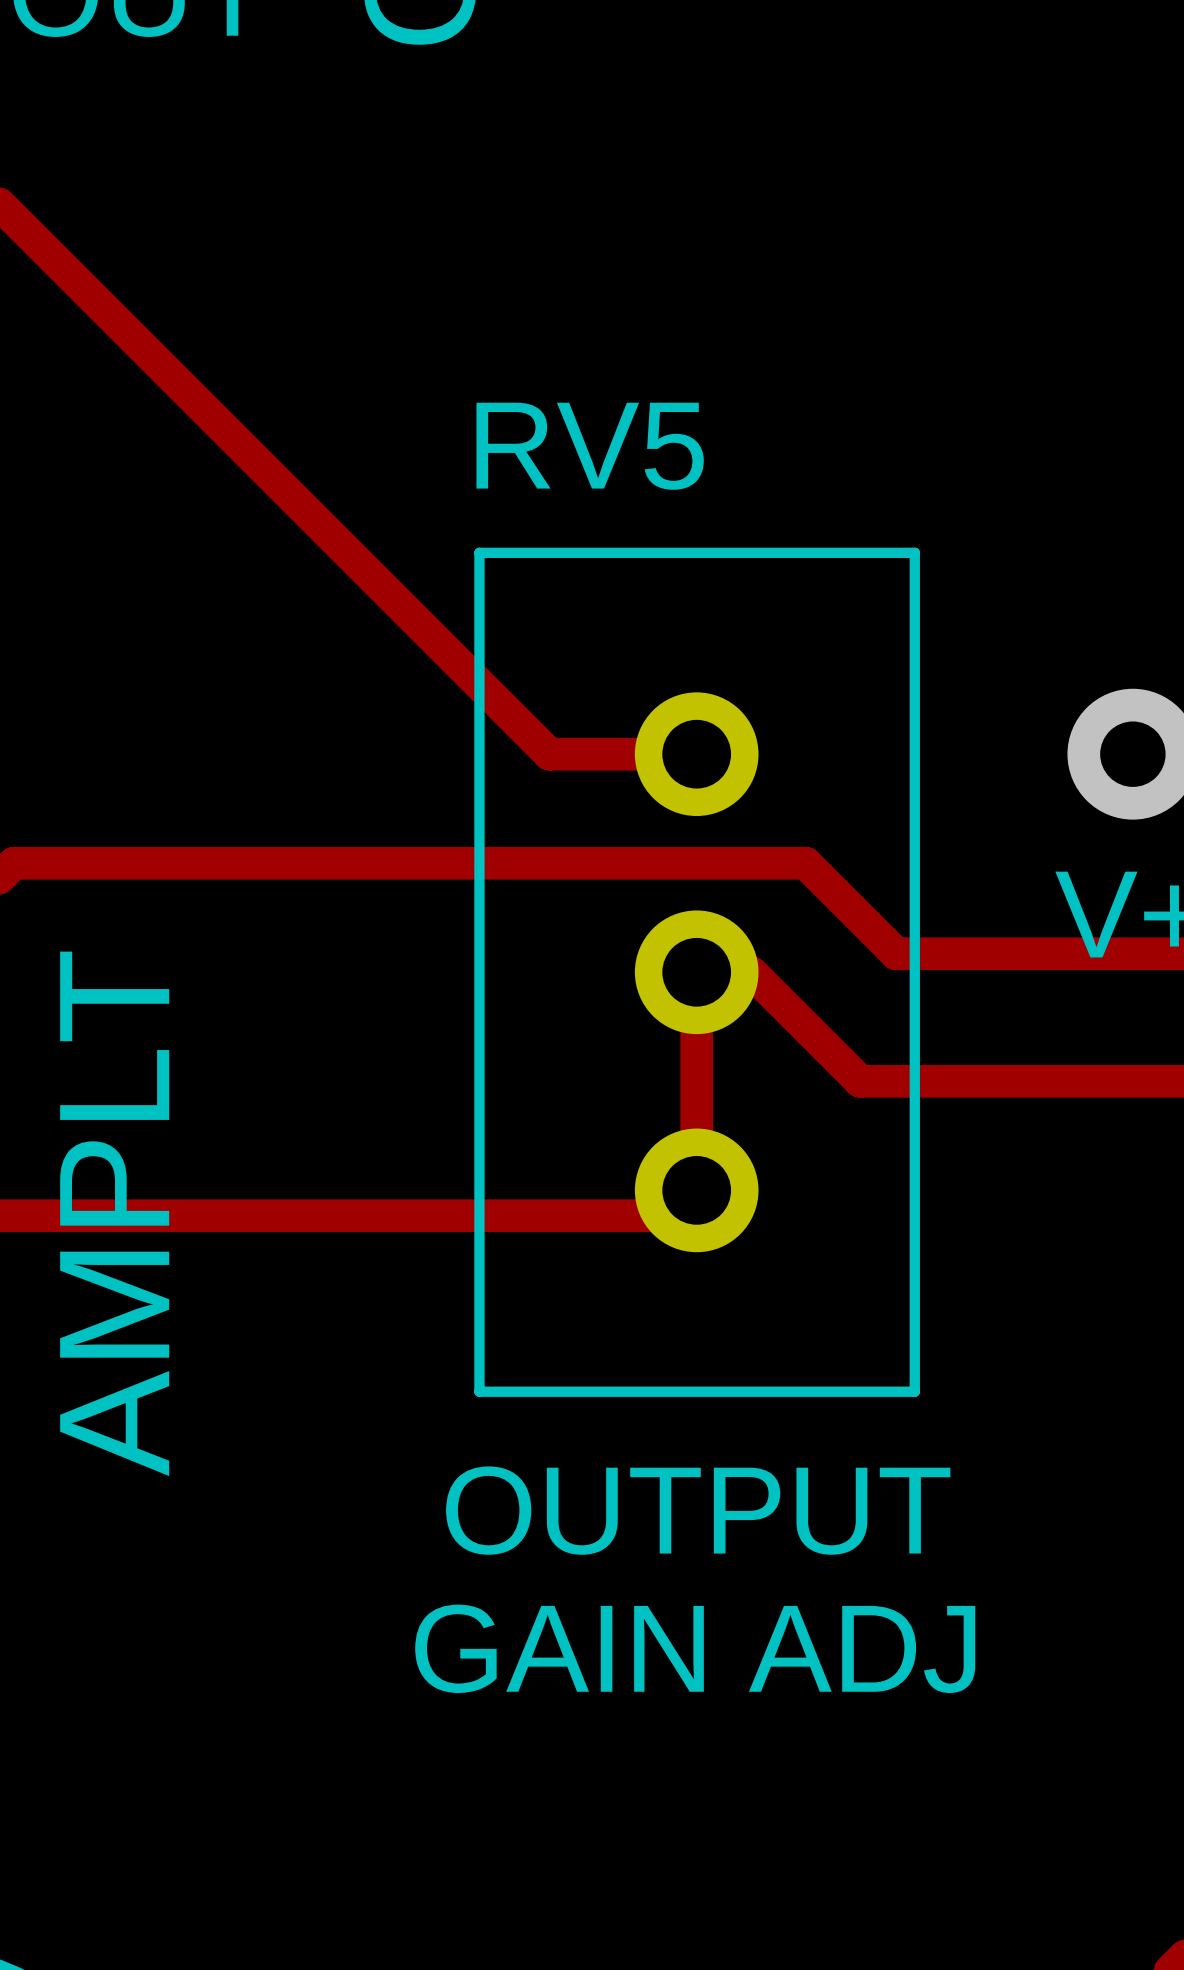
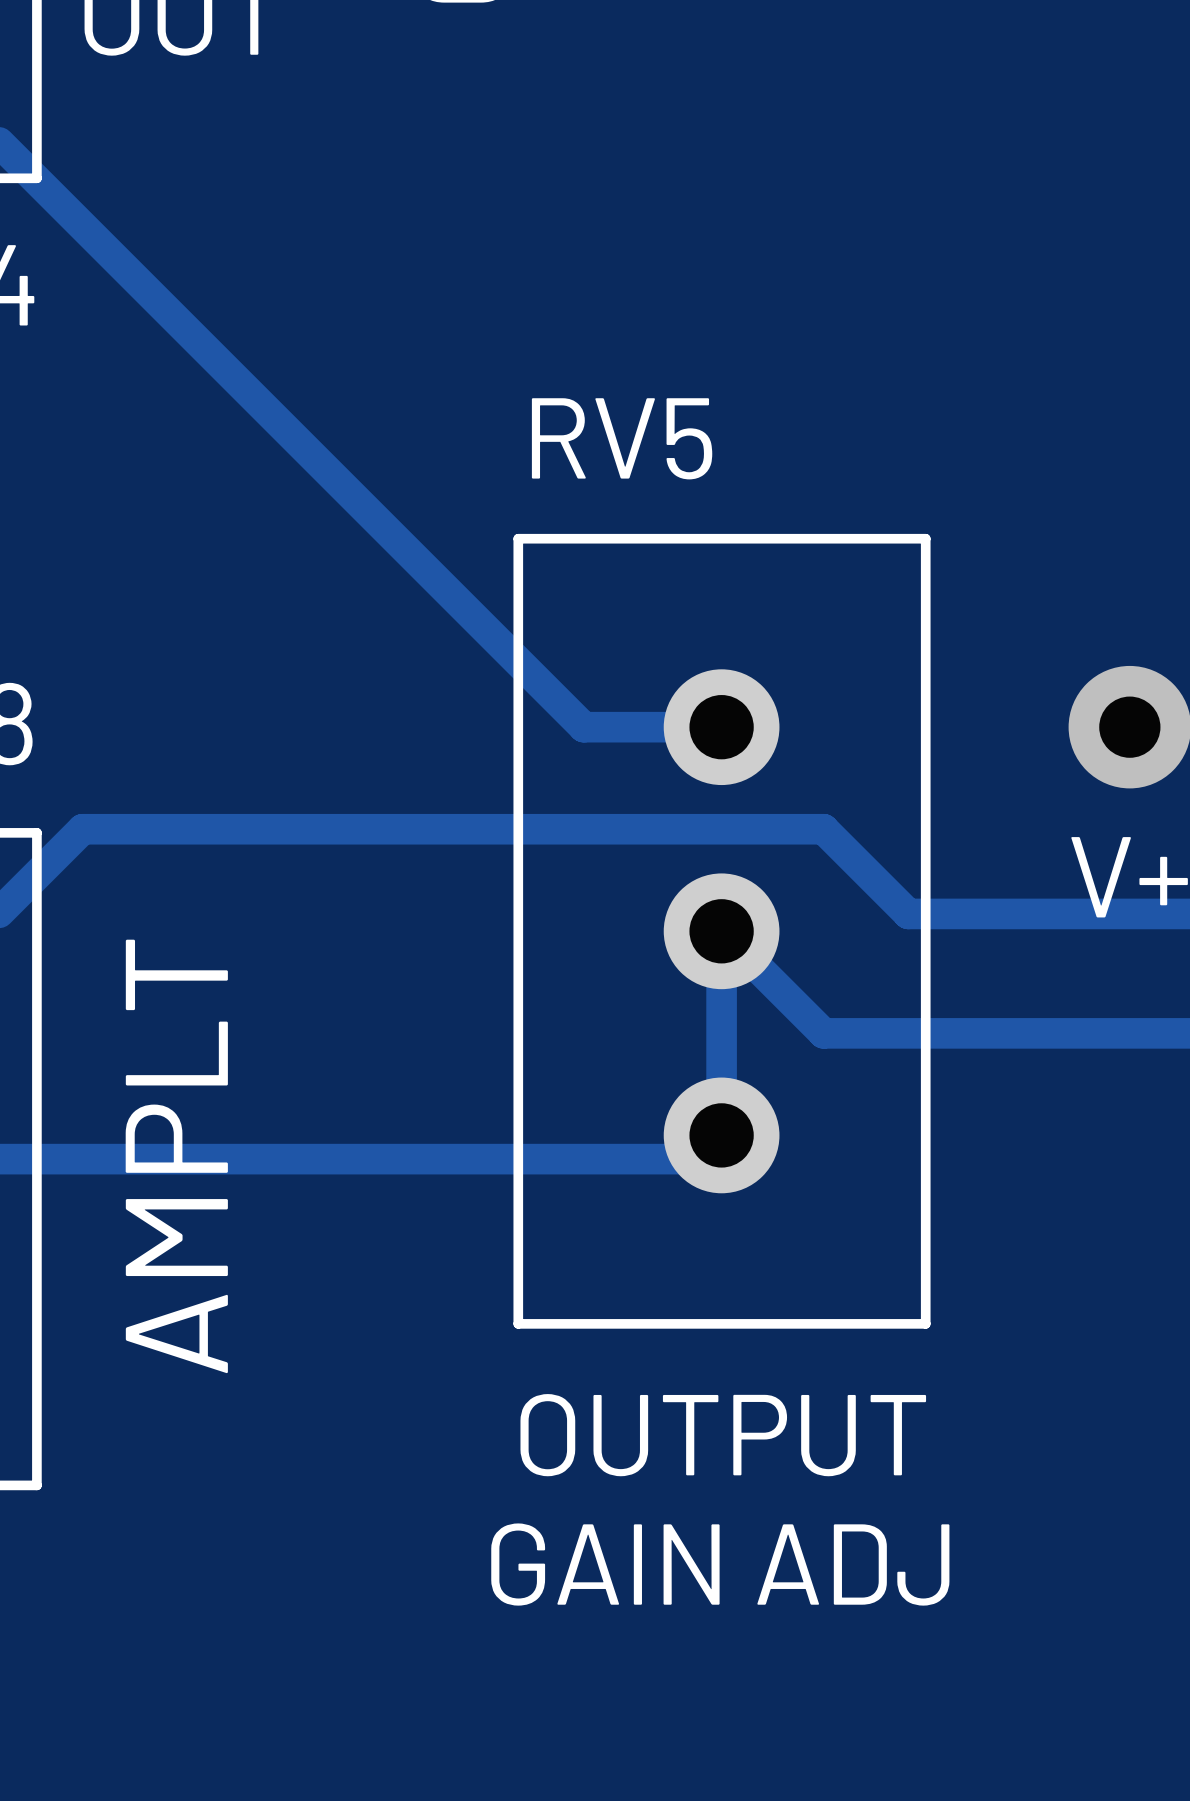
track: (696, 972) (751, 972) (860, 1081) -> (721, 931) (823, 1033) (874, 1033)

